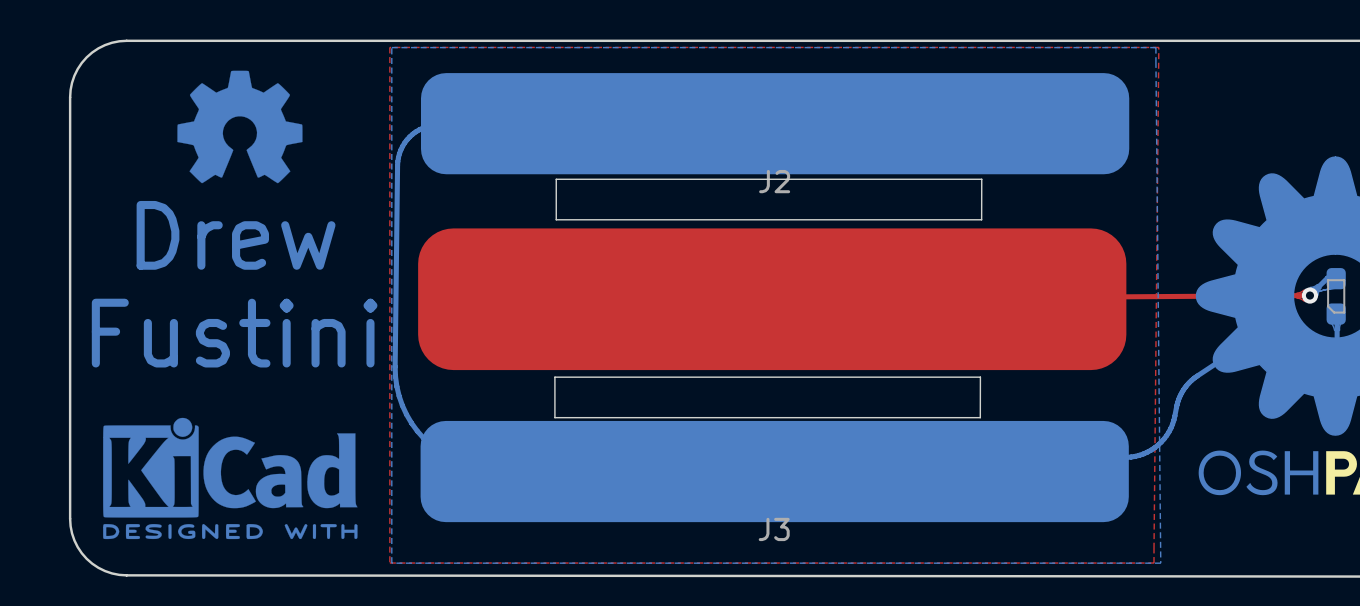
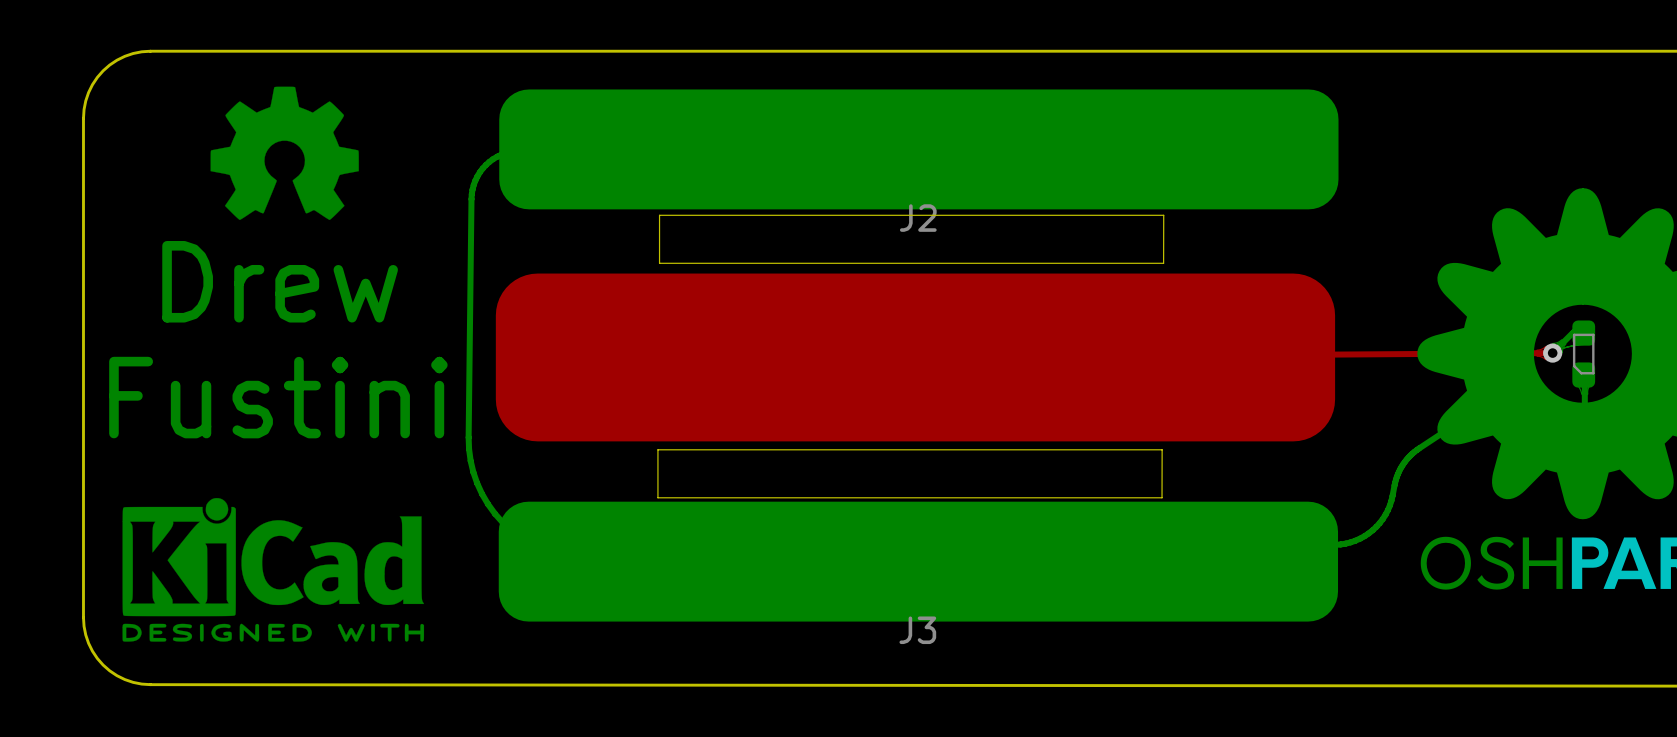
bottom zone outline: (1155, 47) (391, 47) (391, 563) (1160, 563) (1155, 47) -> none
top zone outline: (1158, 47) (1154, 563) (389, 563) (389, 47) (1158, 47) -> none

